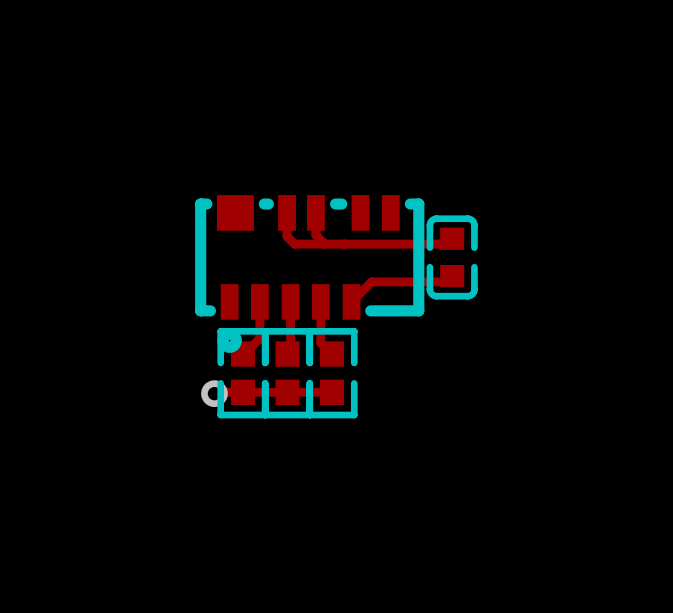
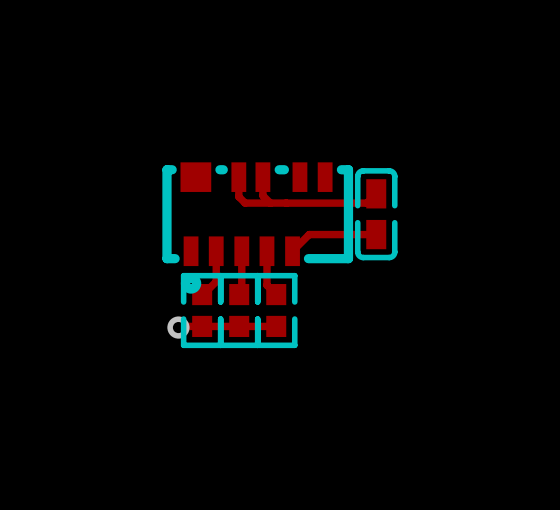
part footprint: [426, 215, 478, 300] -> [354, 168, 398, 261]

